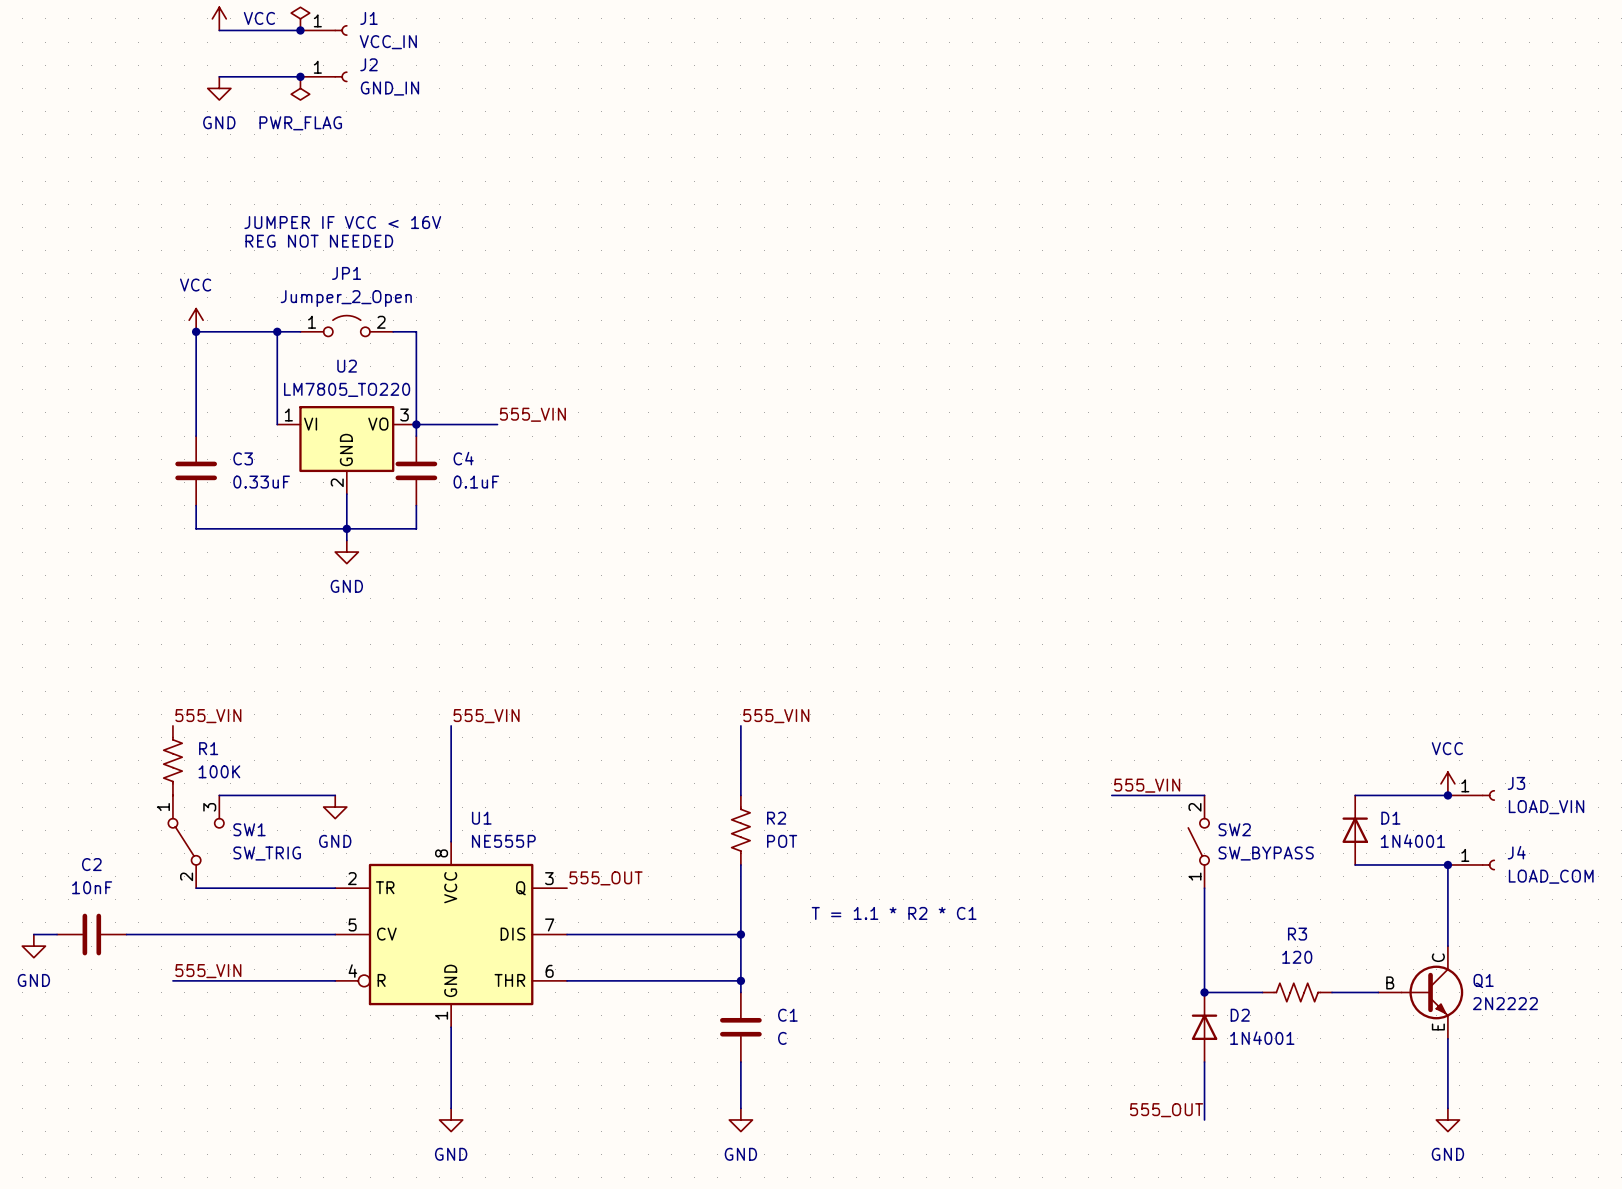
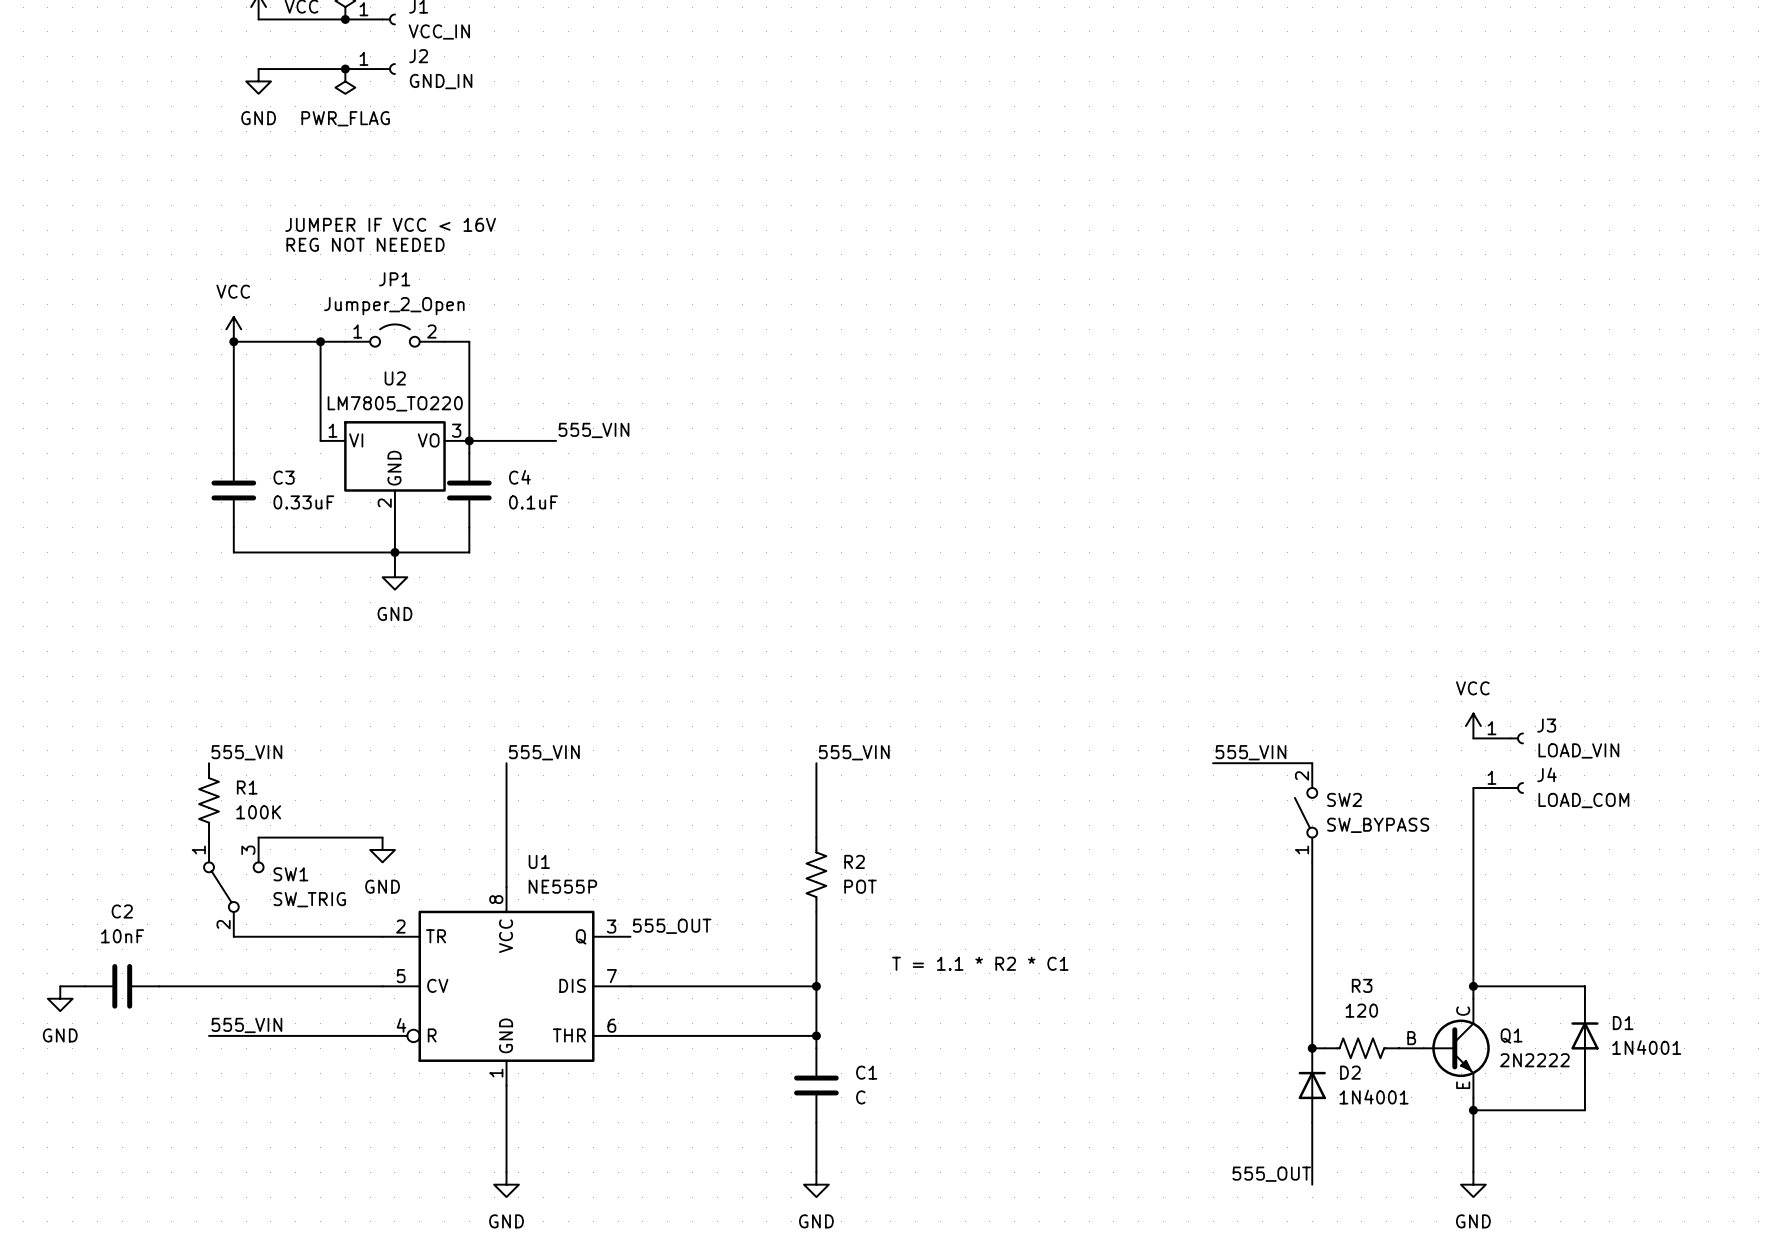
wire: none -> (1473, 788) (1473, 998)
power symbol position: VCC (1447, 783) -> VCC (1473, 726)
label position: 555_VIN (1147, 785) -> 555_VIN (1250, 752)
wire: (1111, 795) (1204, 795) -> (1213, 763) (1312, 763)
wire: (1355, 795) (1447, 795) -> none
junction: (1447, 795) -> none
J3 position: (1471, 795) -> (1498, 738)
wire: none -> (1312, 862) (1312, 936)
D1 position: (1355, 830) -> (1584, 1035)
SW2 position: (1198, 841) -> (1306, 812)
wire: (1355, 864) (1447, 864) (1447, 946) -> none
junction: (1447, 864) -> none
J4 position: (1471, 864) -> (1498, 788)
wire: none -> (1473, 986) (1584, 986) (1584, 998)
junction: none -> (1473, 986)
wire: (1216, 992) (1262, 992) -> none
R3 position: (1297, 992) -> (1361, 1048)
wire: (1332, 992) (1378, 992) -> none
Q1 position: (1420, 992) -> (1444, 1048)
wire: none -> (1584, 1073) (1584, 1110) (1473, 1110)
wire: (1447, 1038) (1447, 1108) -> (1473, 1097) (1473, 1172)
junction: none -> (1473, 1110)
power symbol position: GND (1447, 1119) -> GND (1473, 1184)

